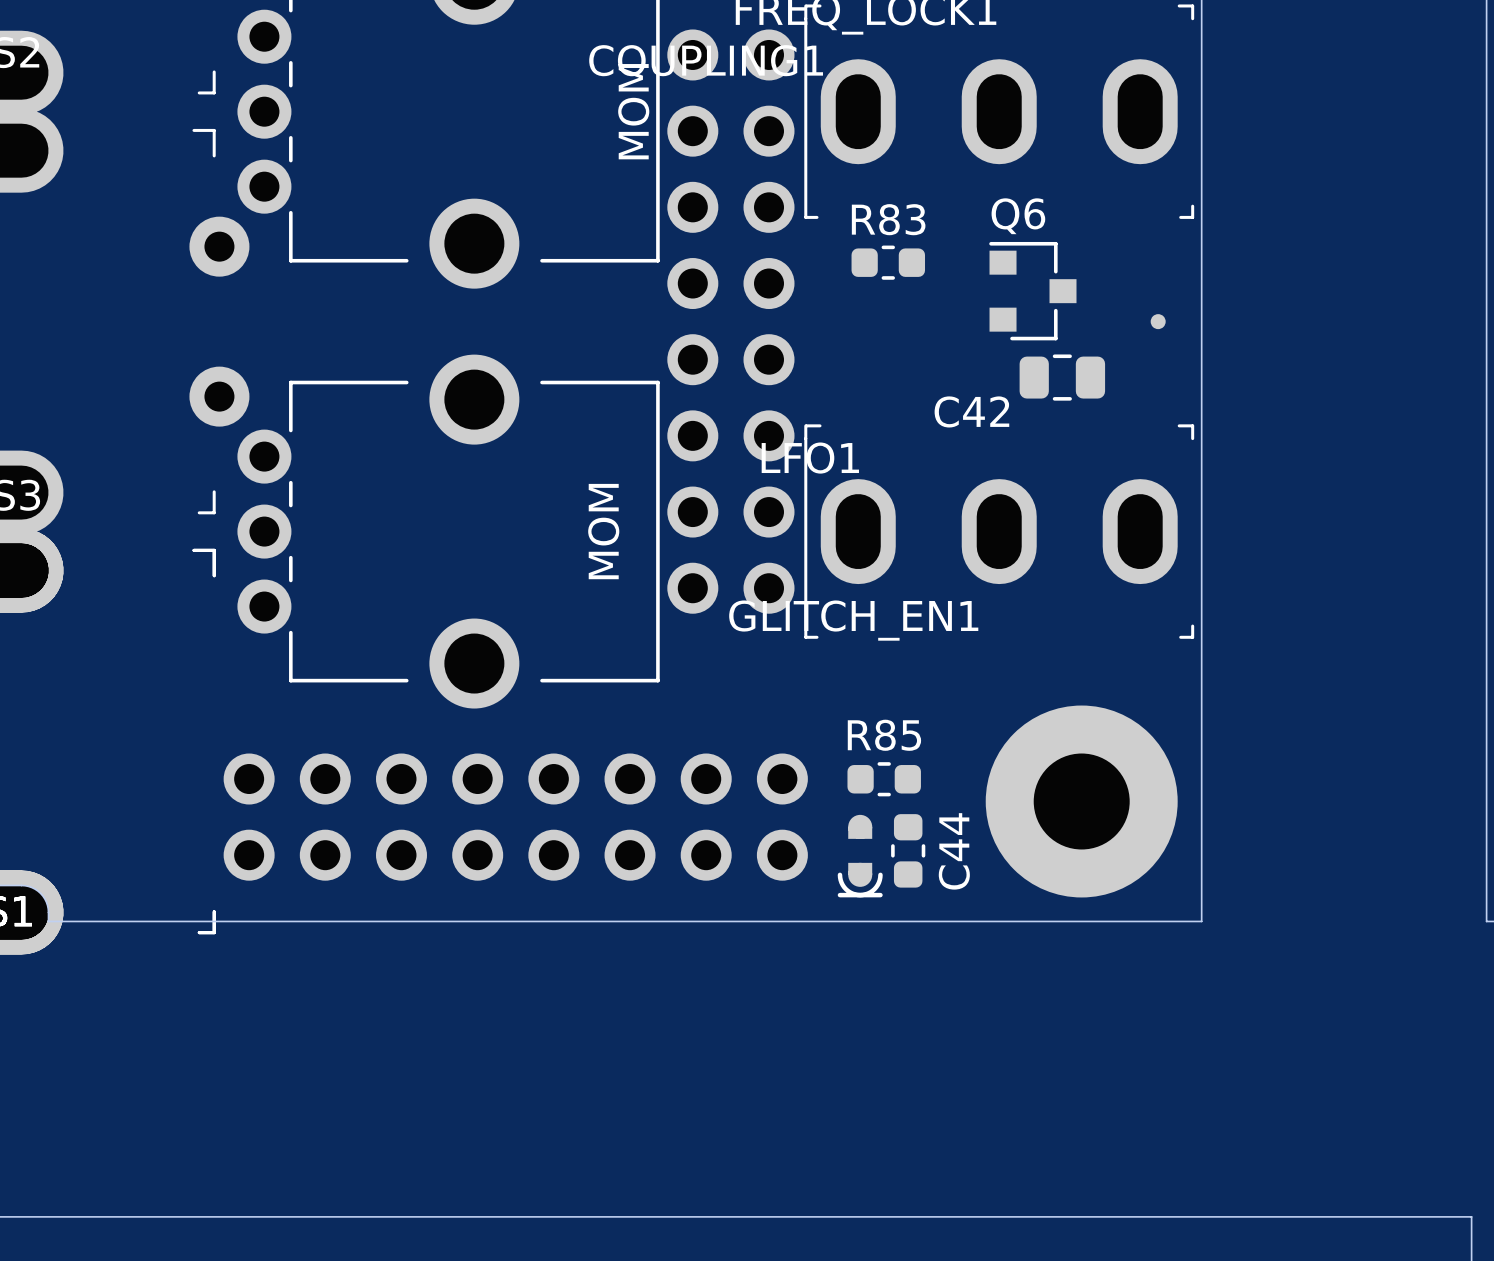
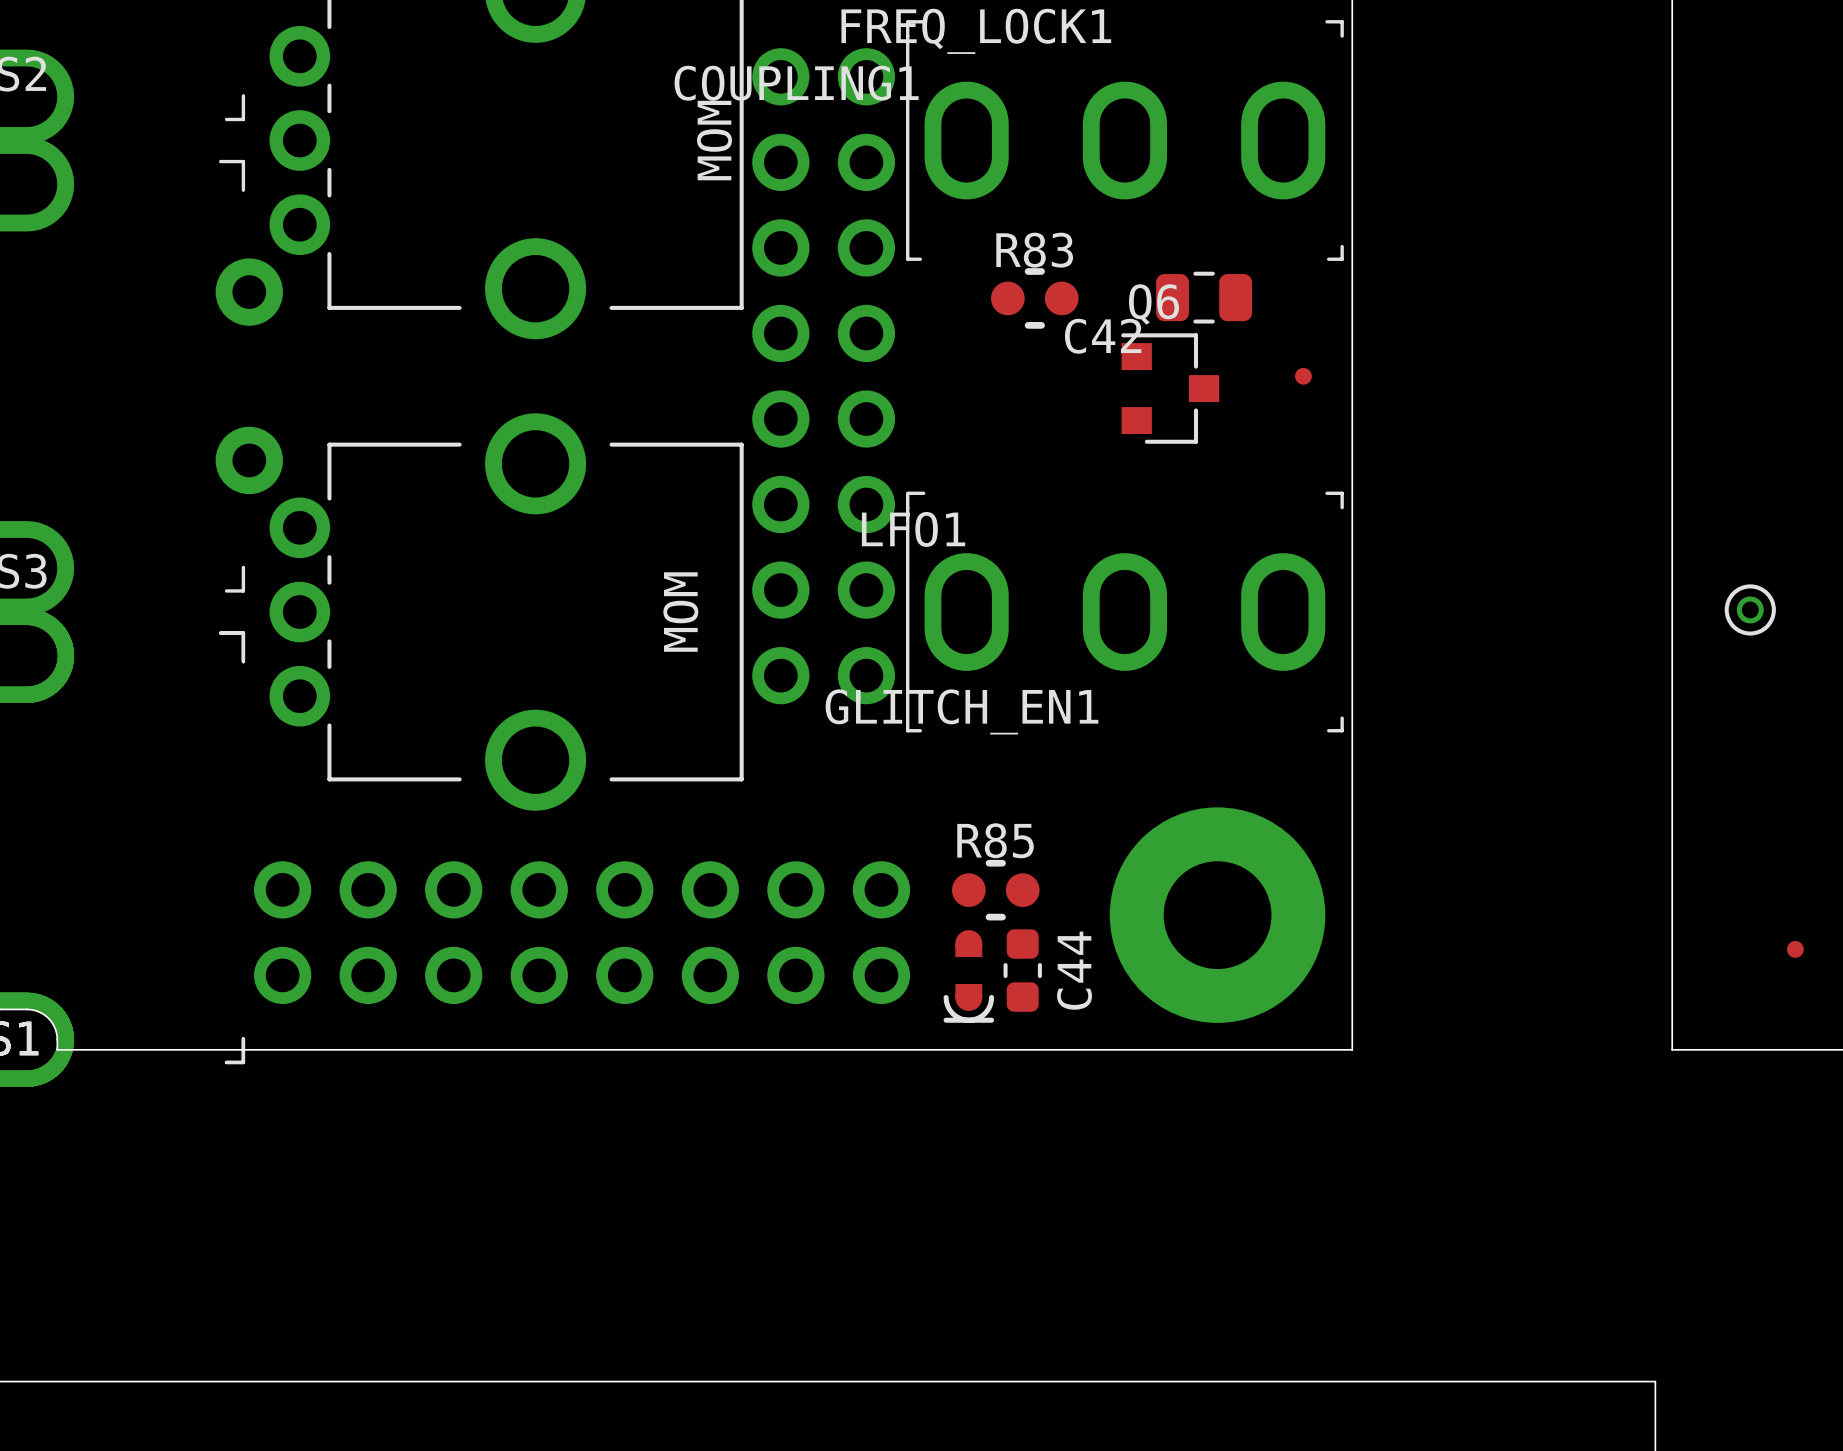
R83 footprint: [851, 245, 926, 280] -> [991, 268, 1079, 329]
Q6 position: (1032, 291) -> (1170, 388)
C42 position: (1062, 377) -> (1204, 297)
R85 footprint: [847, 762, 921, 797] -> [952, 859, 1040, 921]

